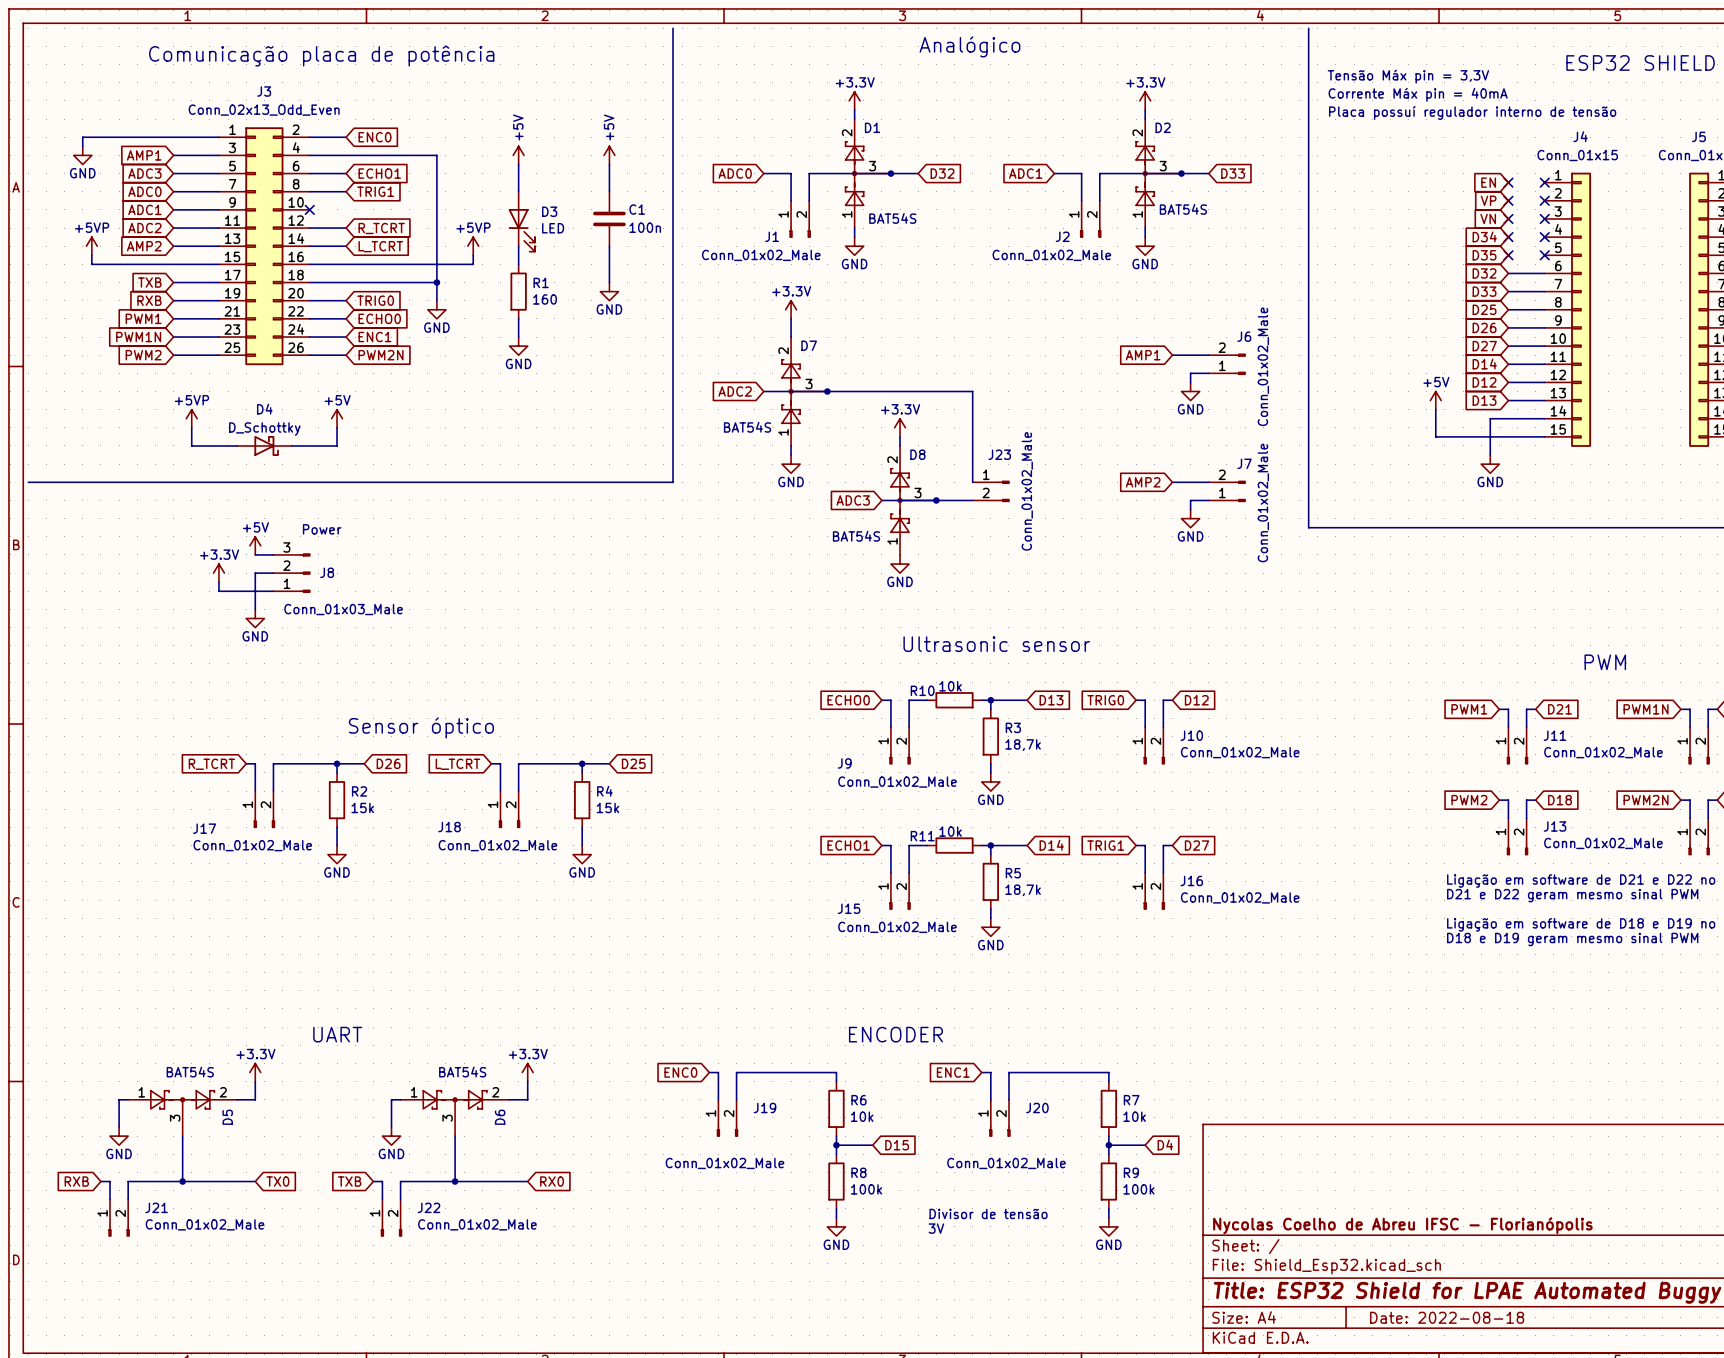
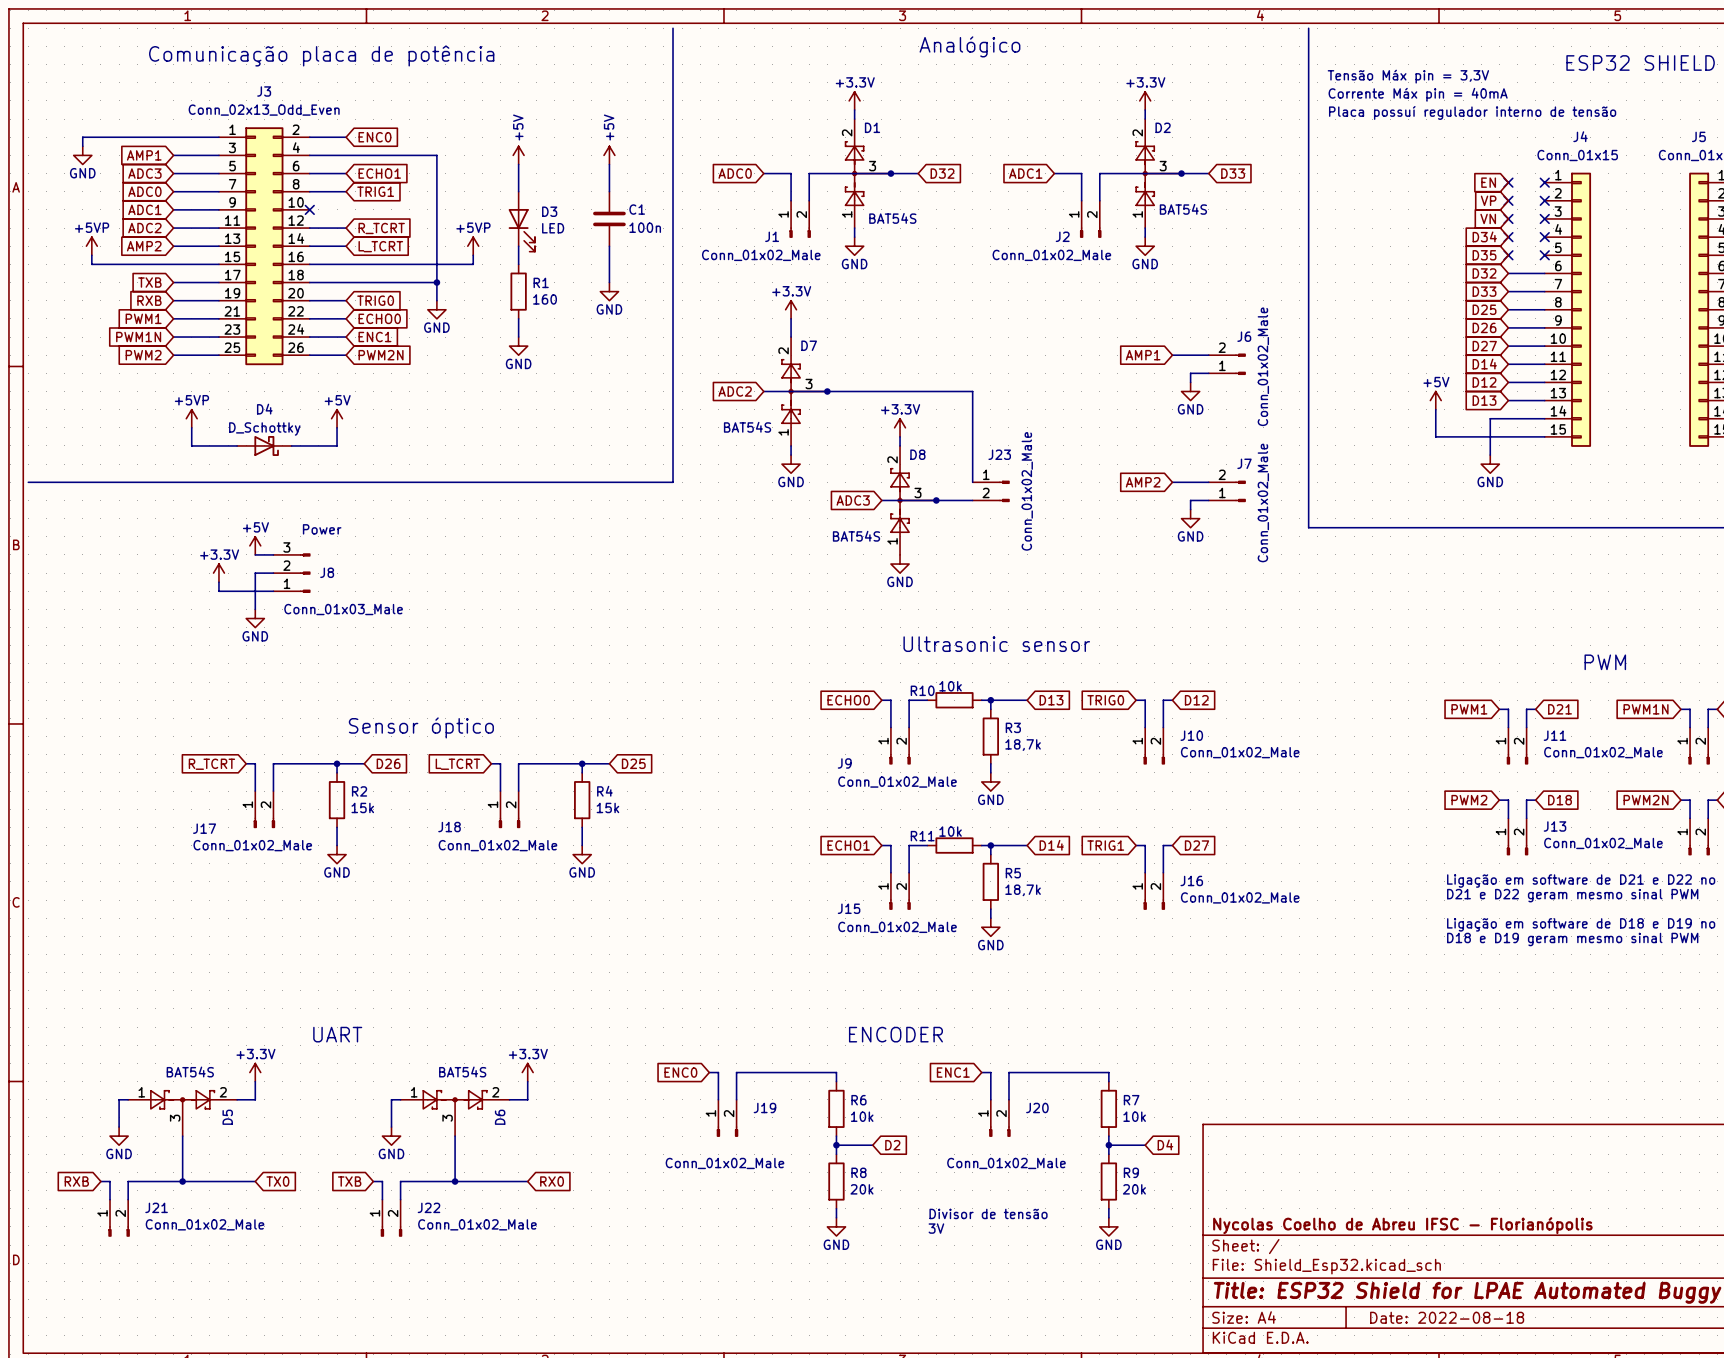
global label: D15 (897, 1145) -> D2 (892, 1145)
R8 value: 100k (866, 1189) -> 20k (861, 1189)
R9 value: 100k (1138, 1189) -> 20k (1134, 1189)

